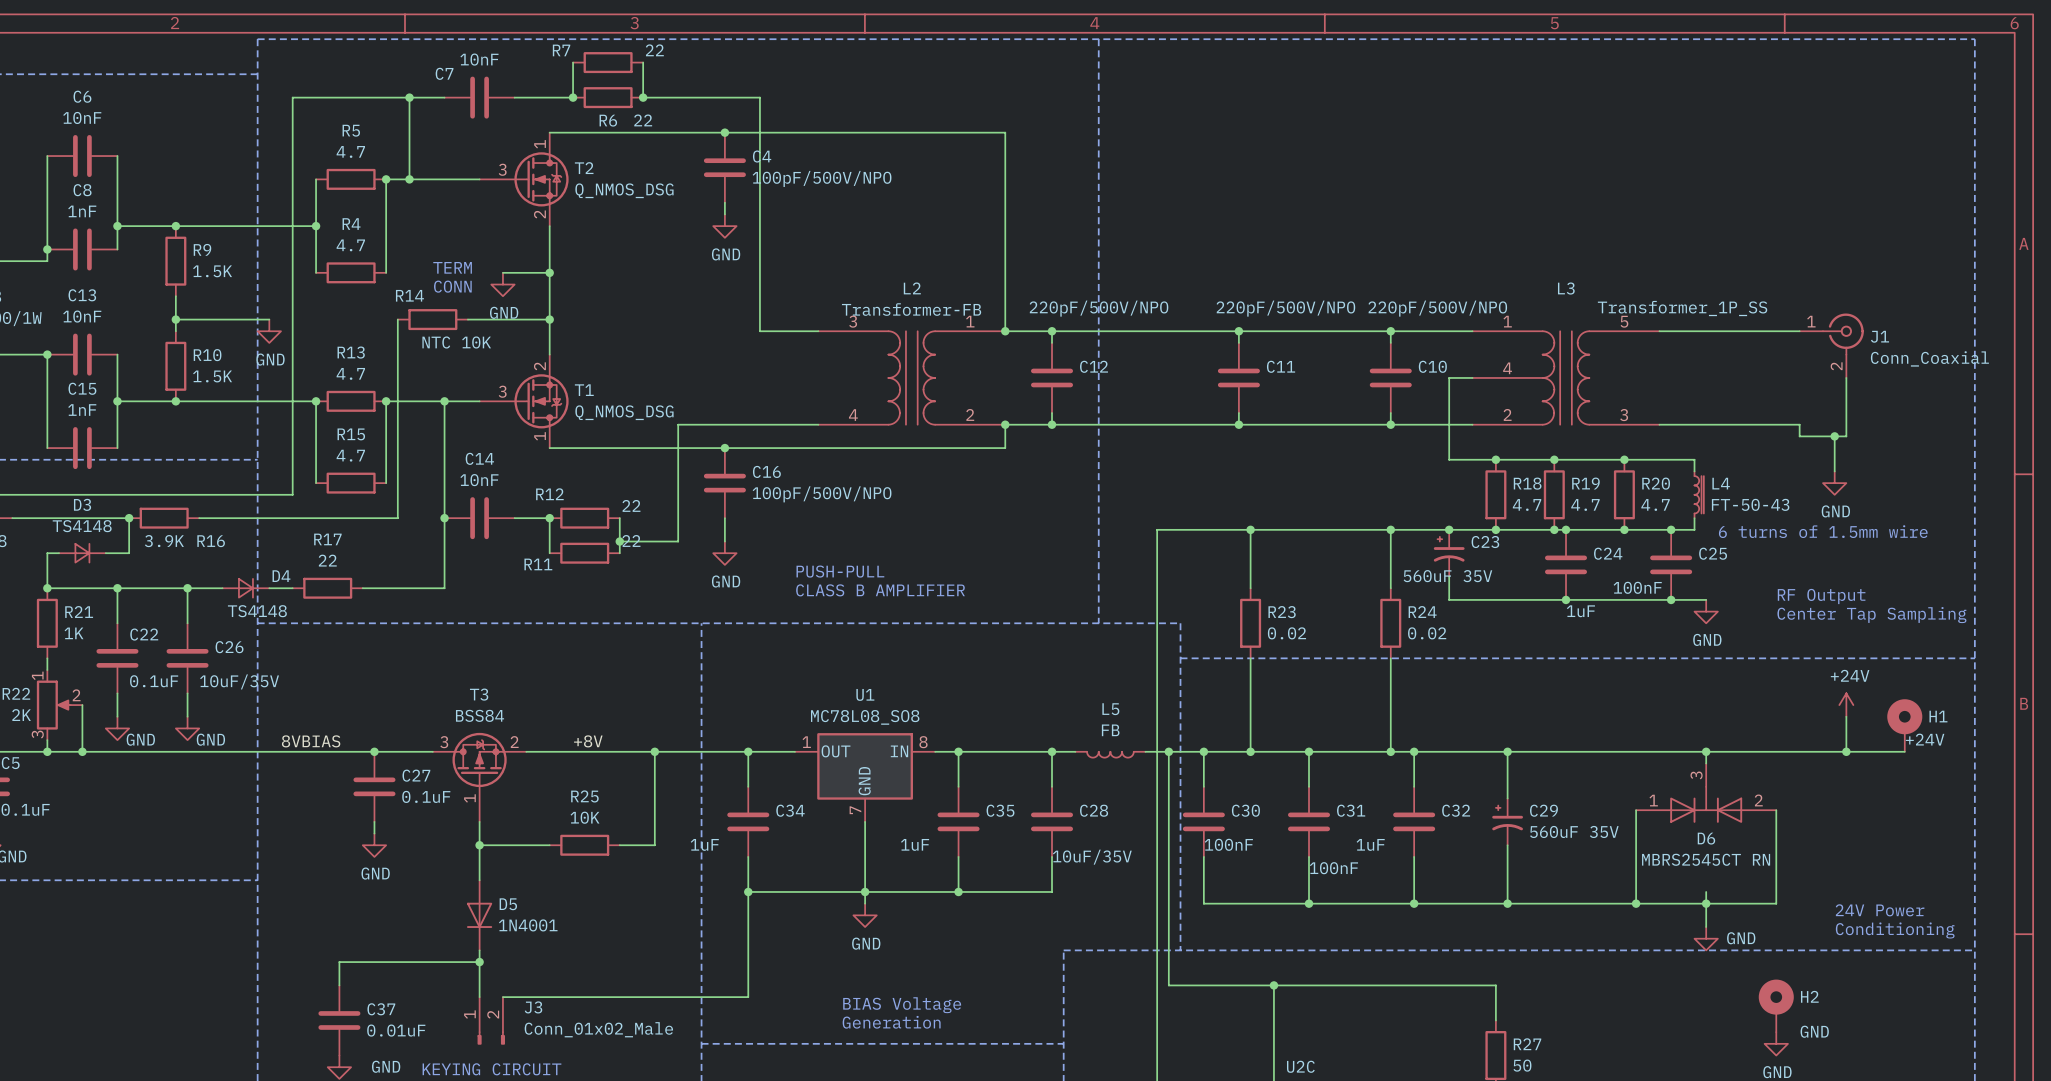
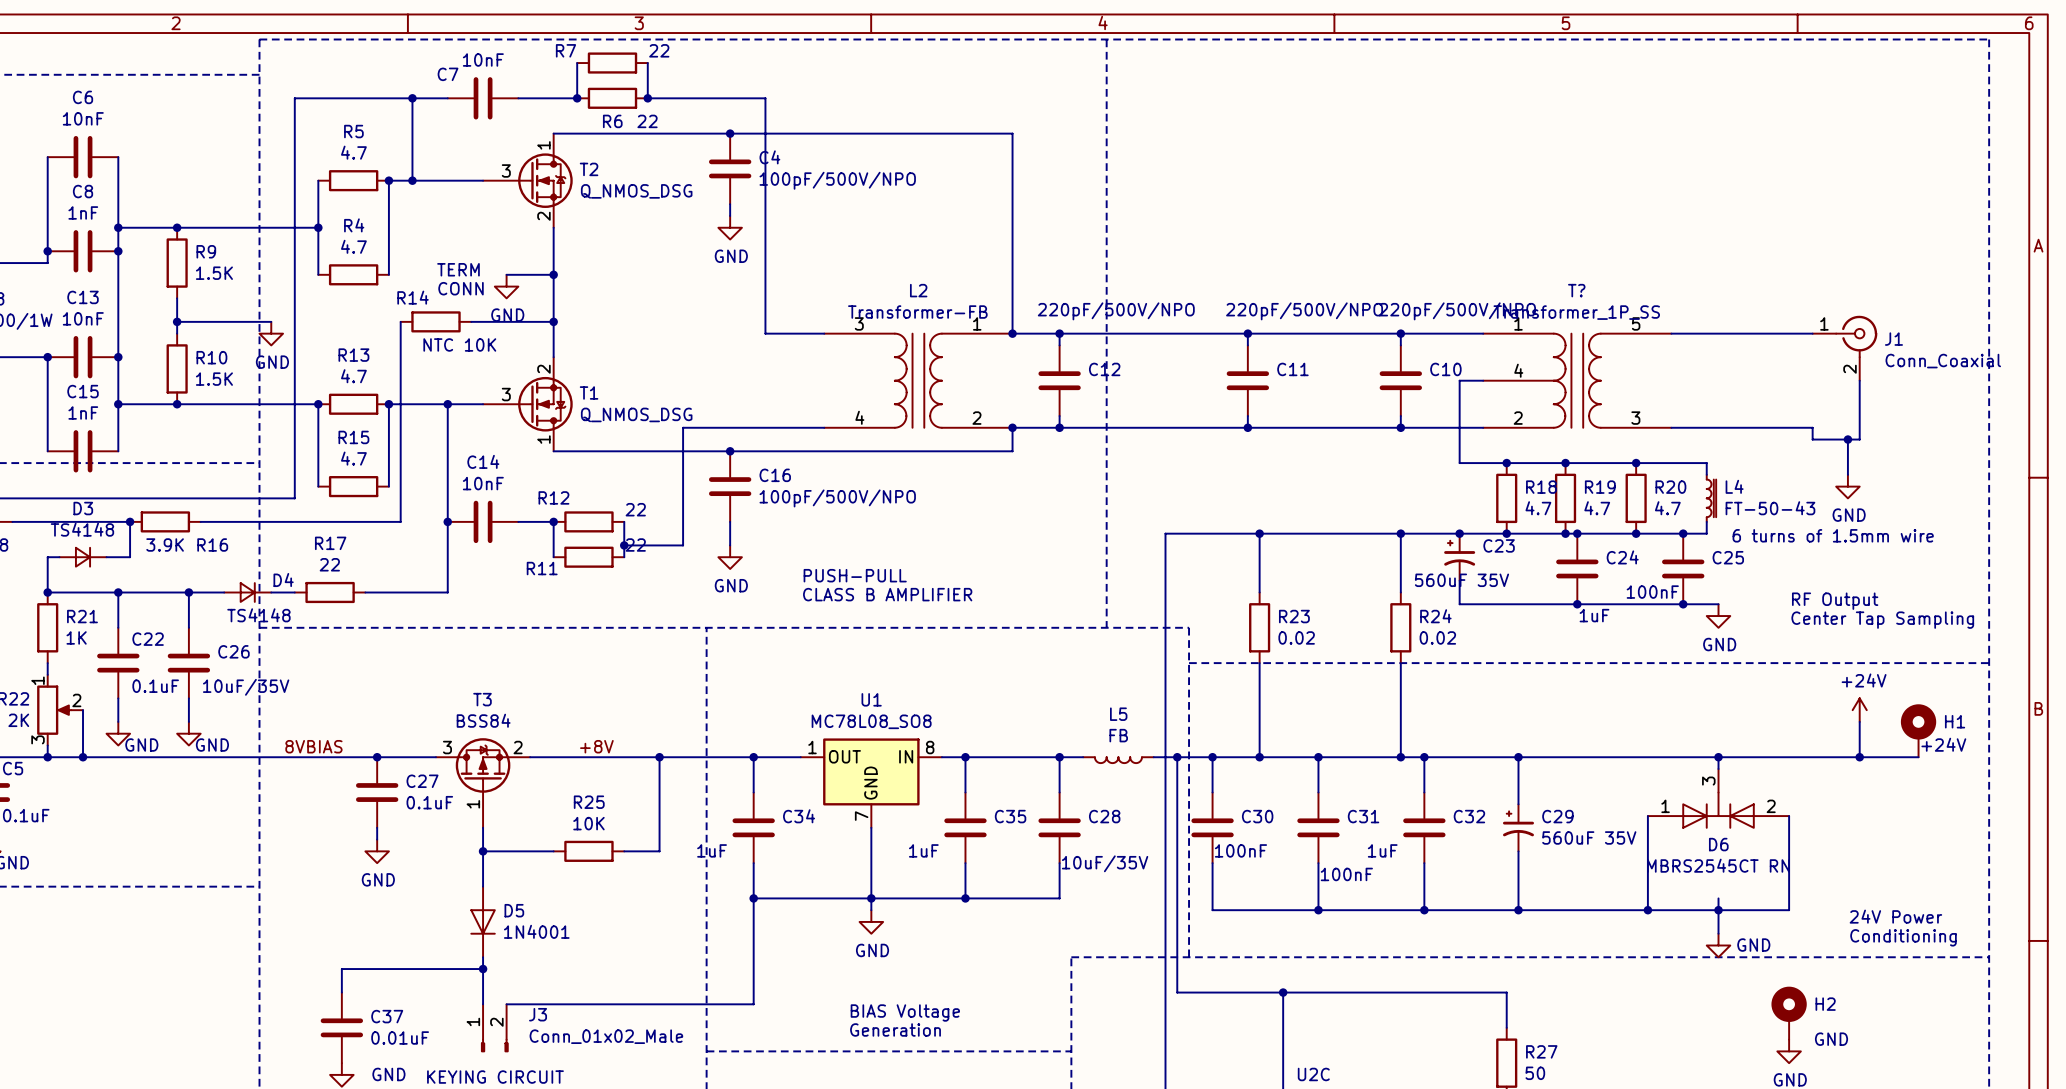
wire: none -> (118, 251) (118, 357)
junction: none -> (118, 251)
L3 name: L3 (1566, 288) -> T? (1576, 290)
L3 value position: Transformer_1P_SS (1682, 308) -> Transformer_1P_SS (1576, 312)
junction: none -> (118, 357)

